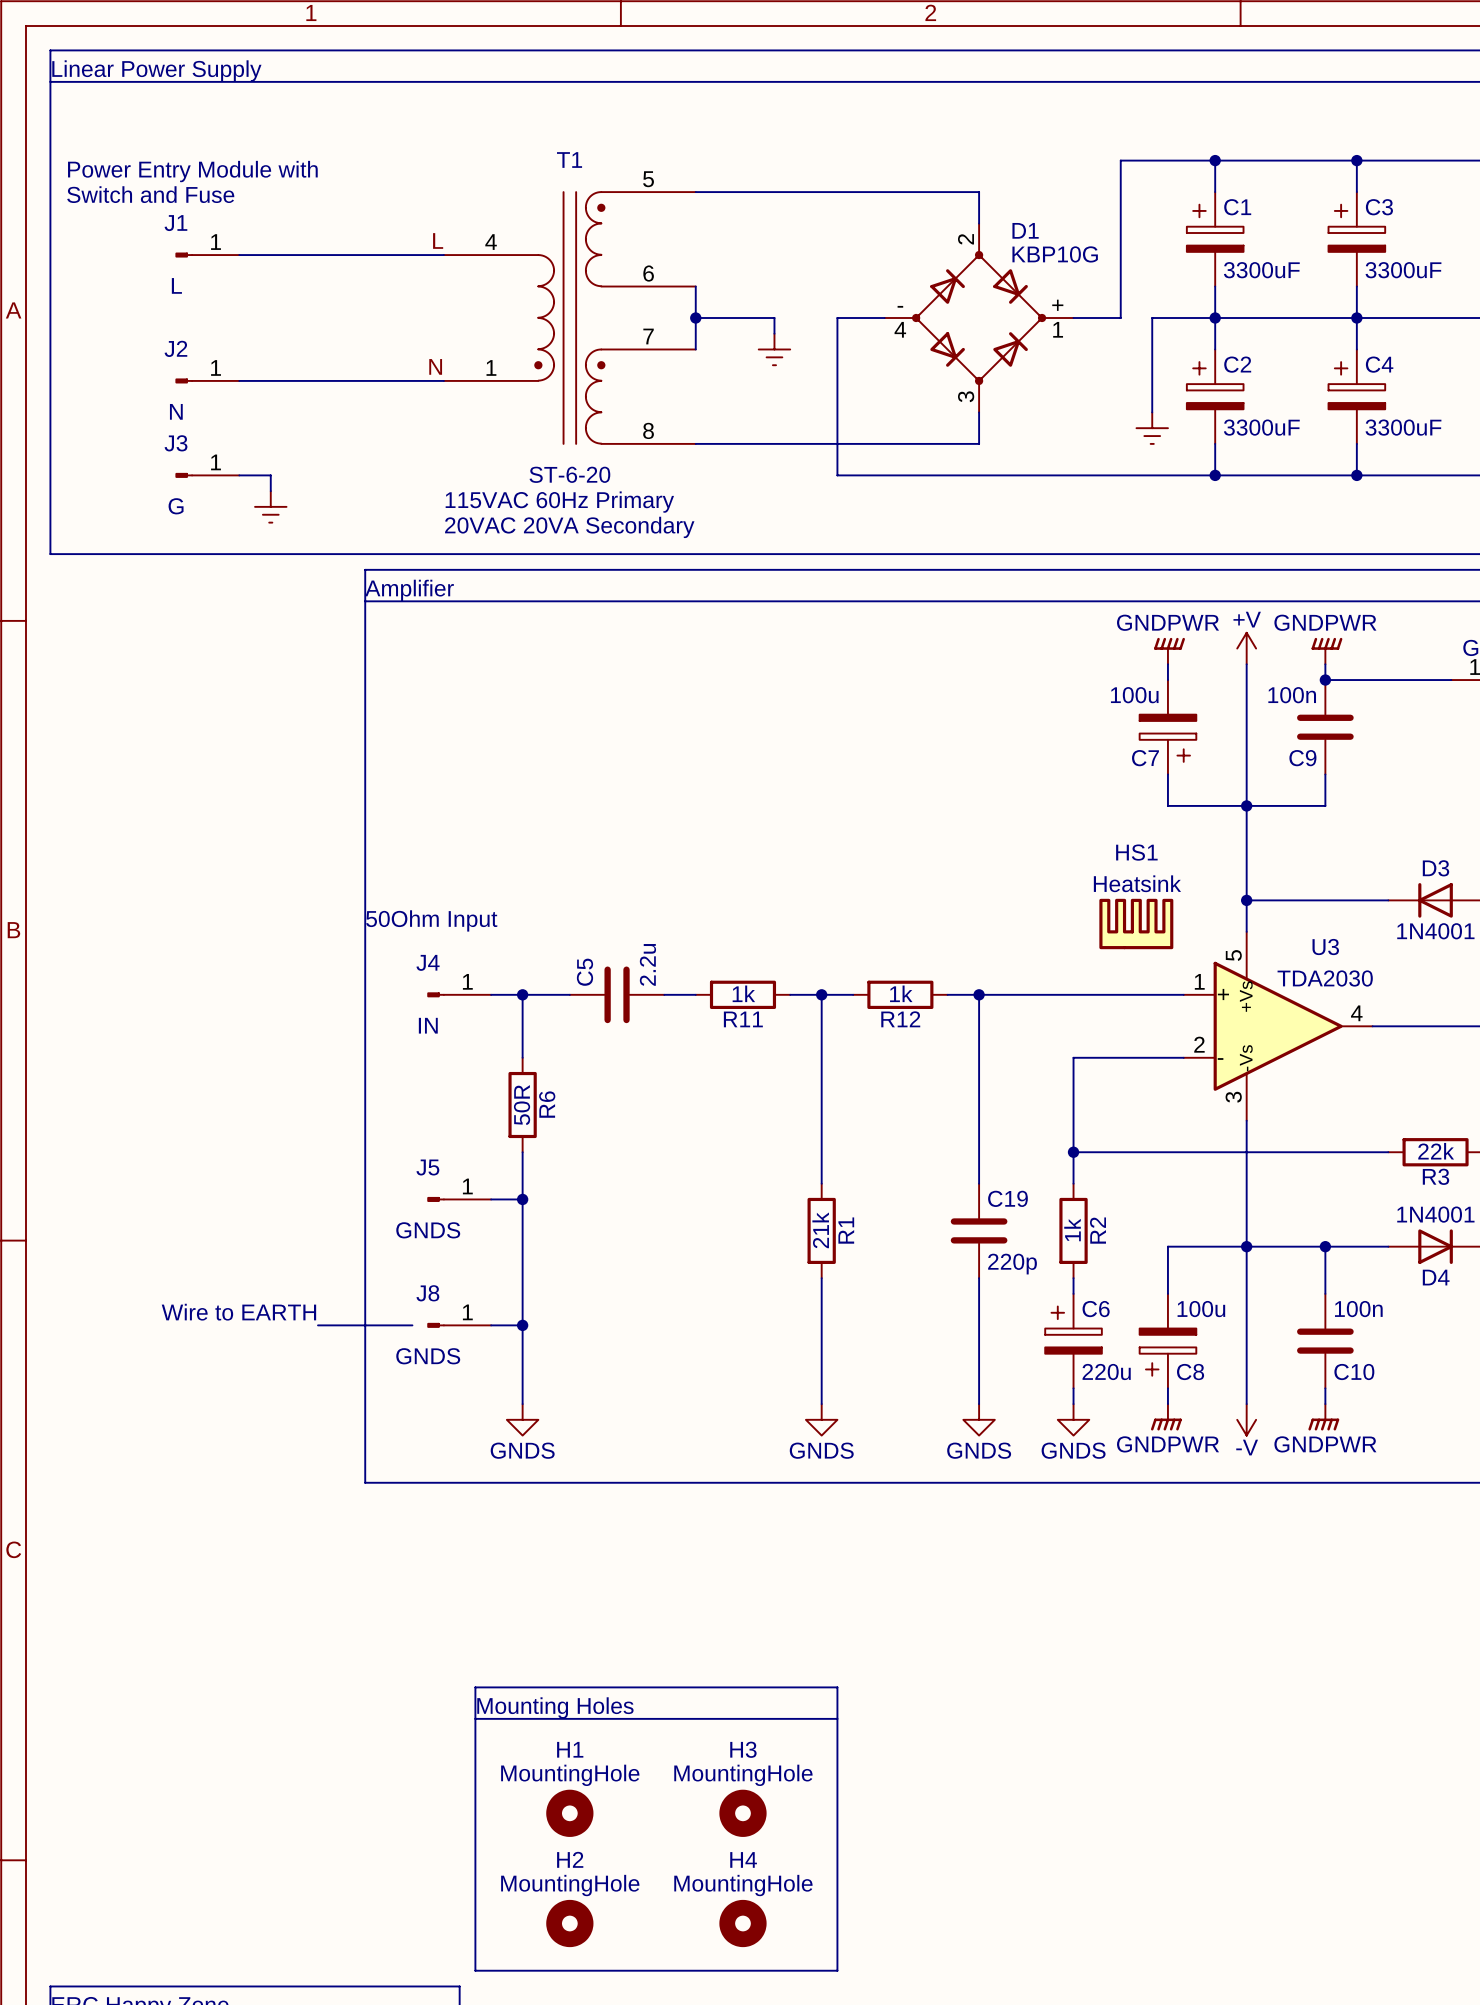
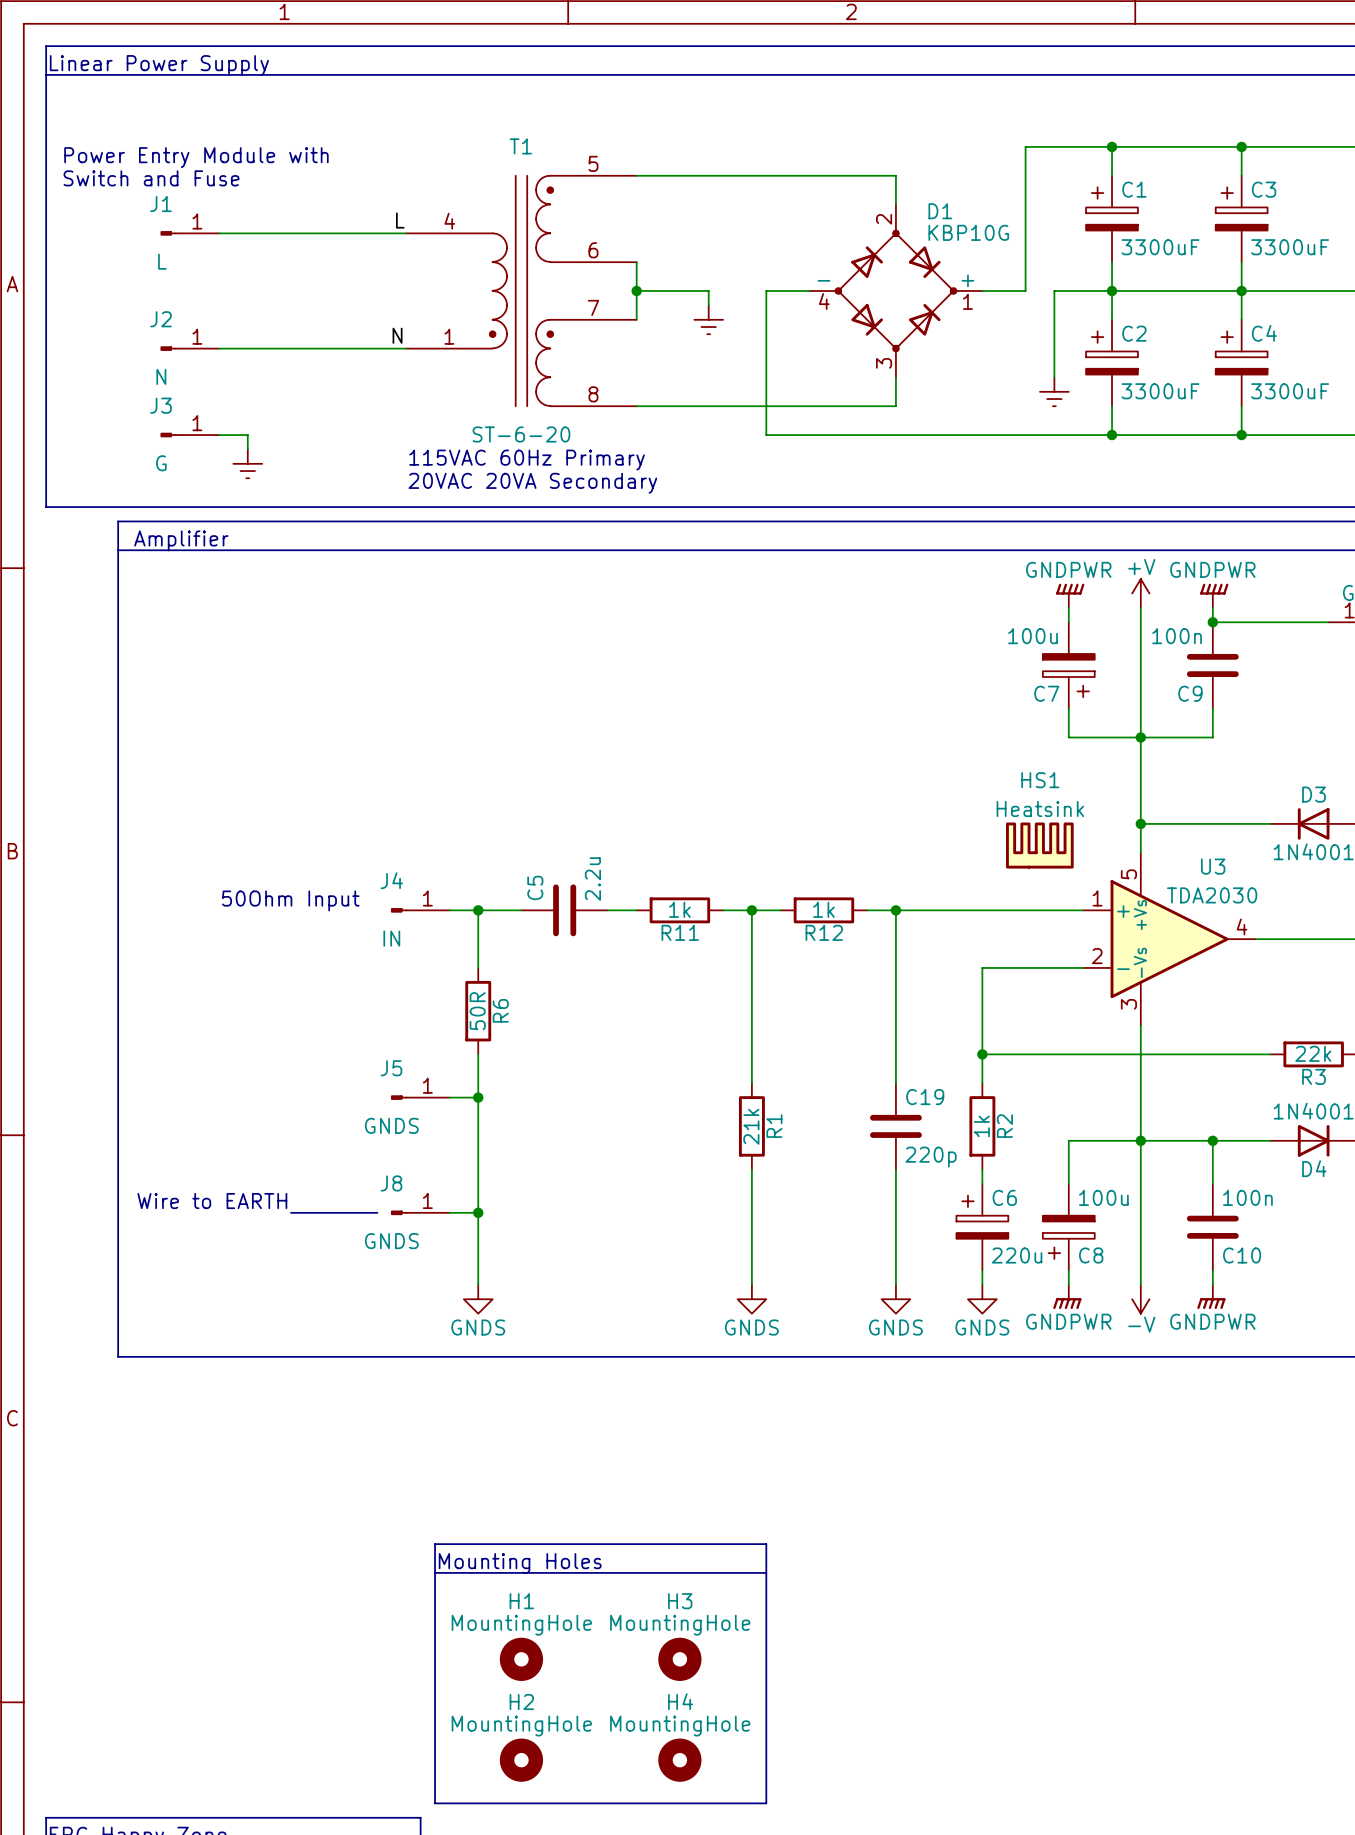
line: (365, 569) (365, 1482) -> (334, 521) (118, 521) (118, 1356) (334, 1356)
text position: Amplifier (409, 590) -> Amplifier (181, 540)
line: none -> (118, 550) (334, 550)
text position: 50Ohm Input (431, 920) -> 50Ohm Input (290, 900)

